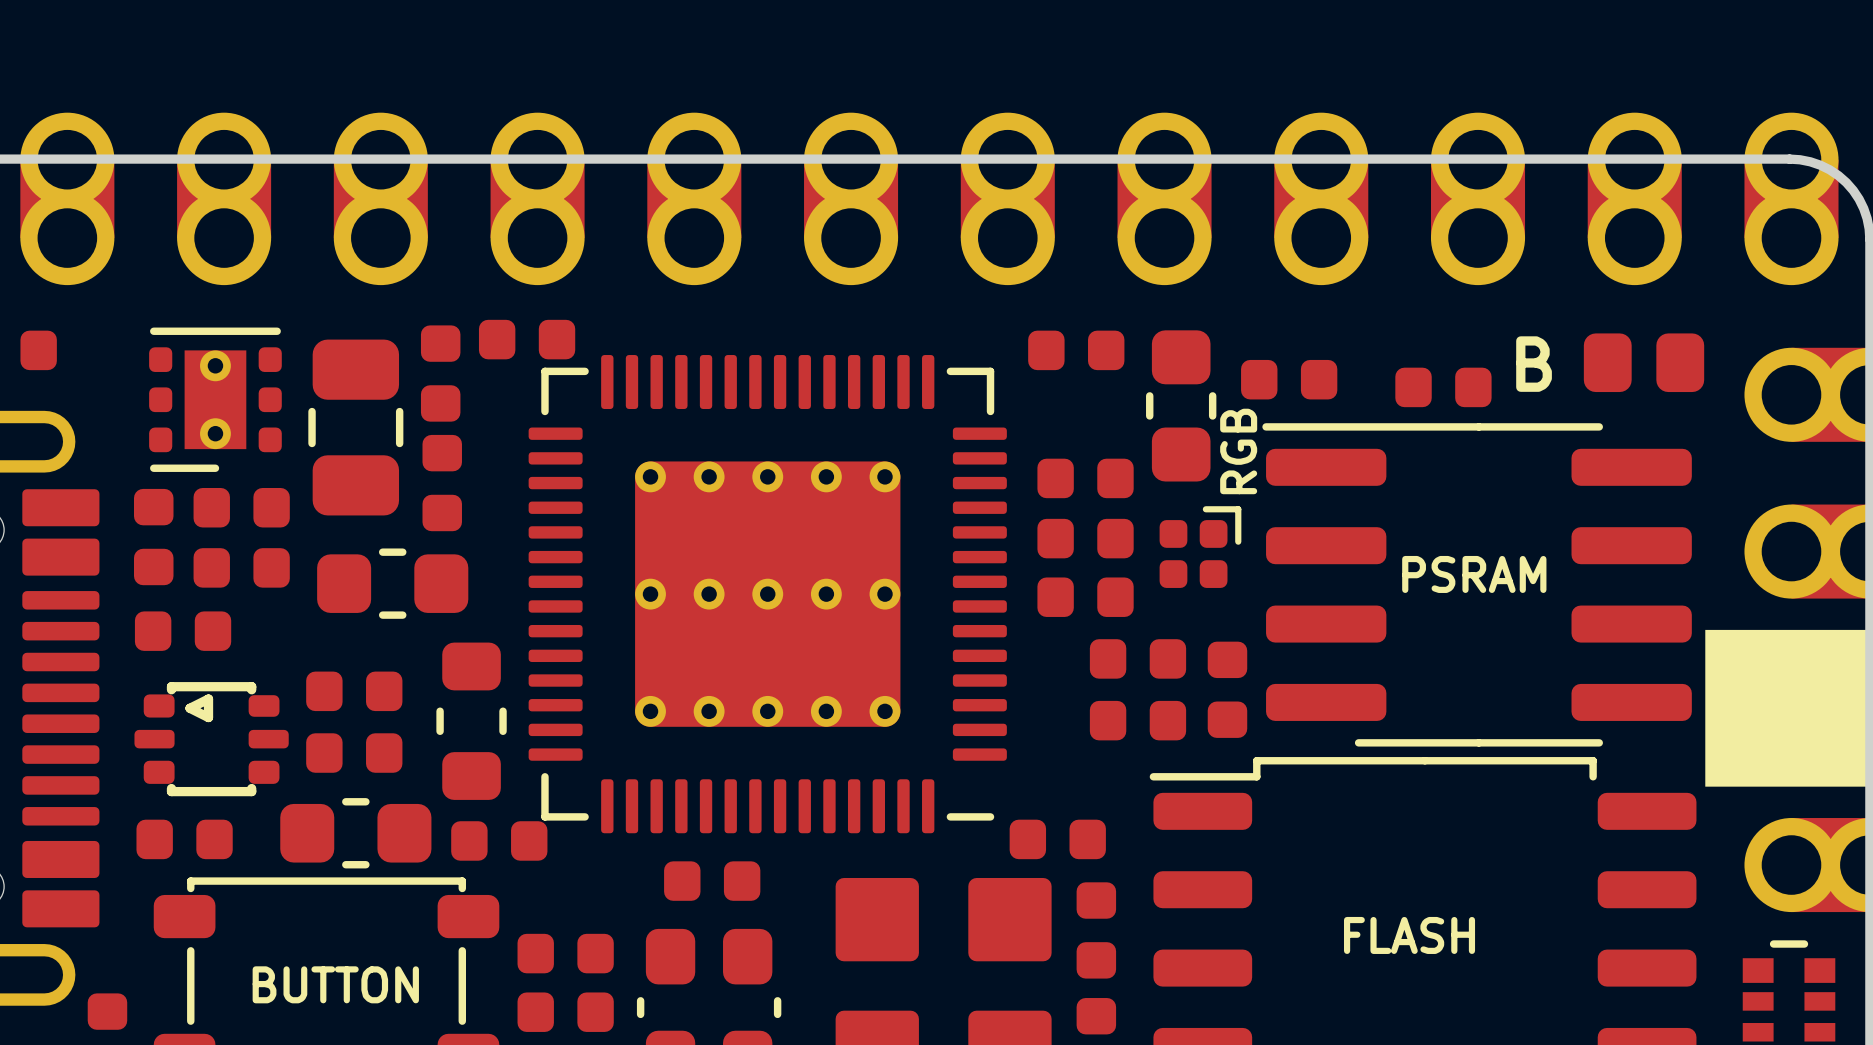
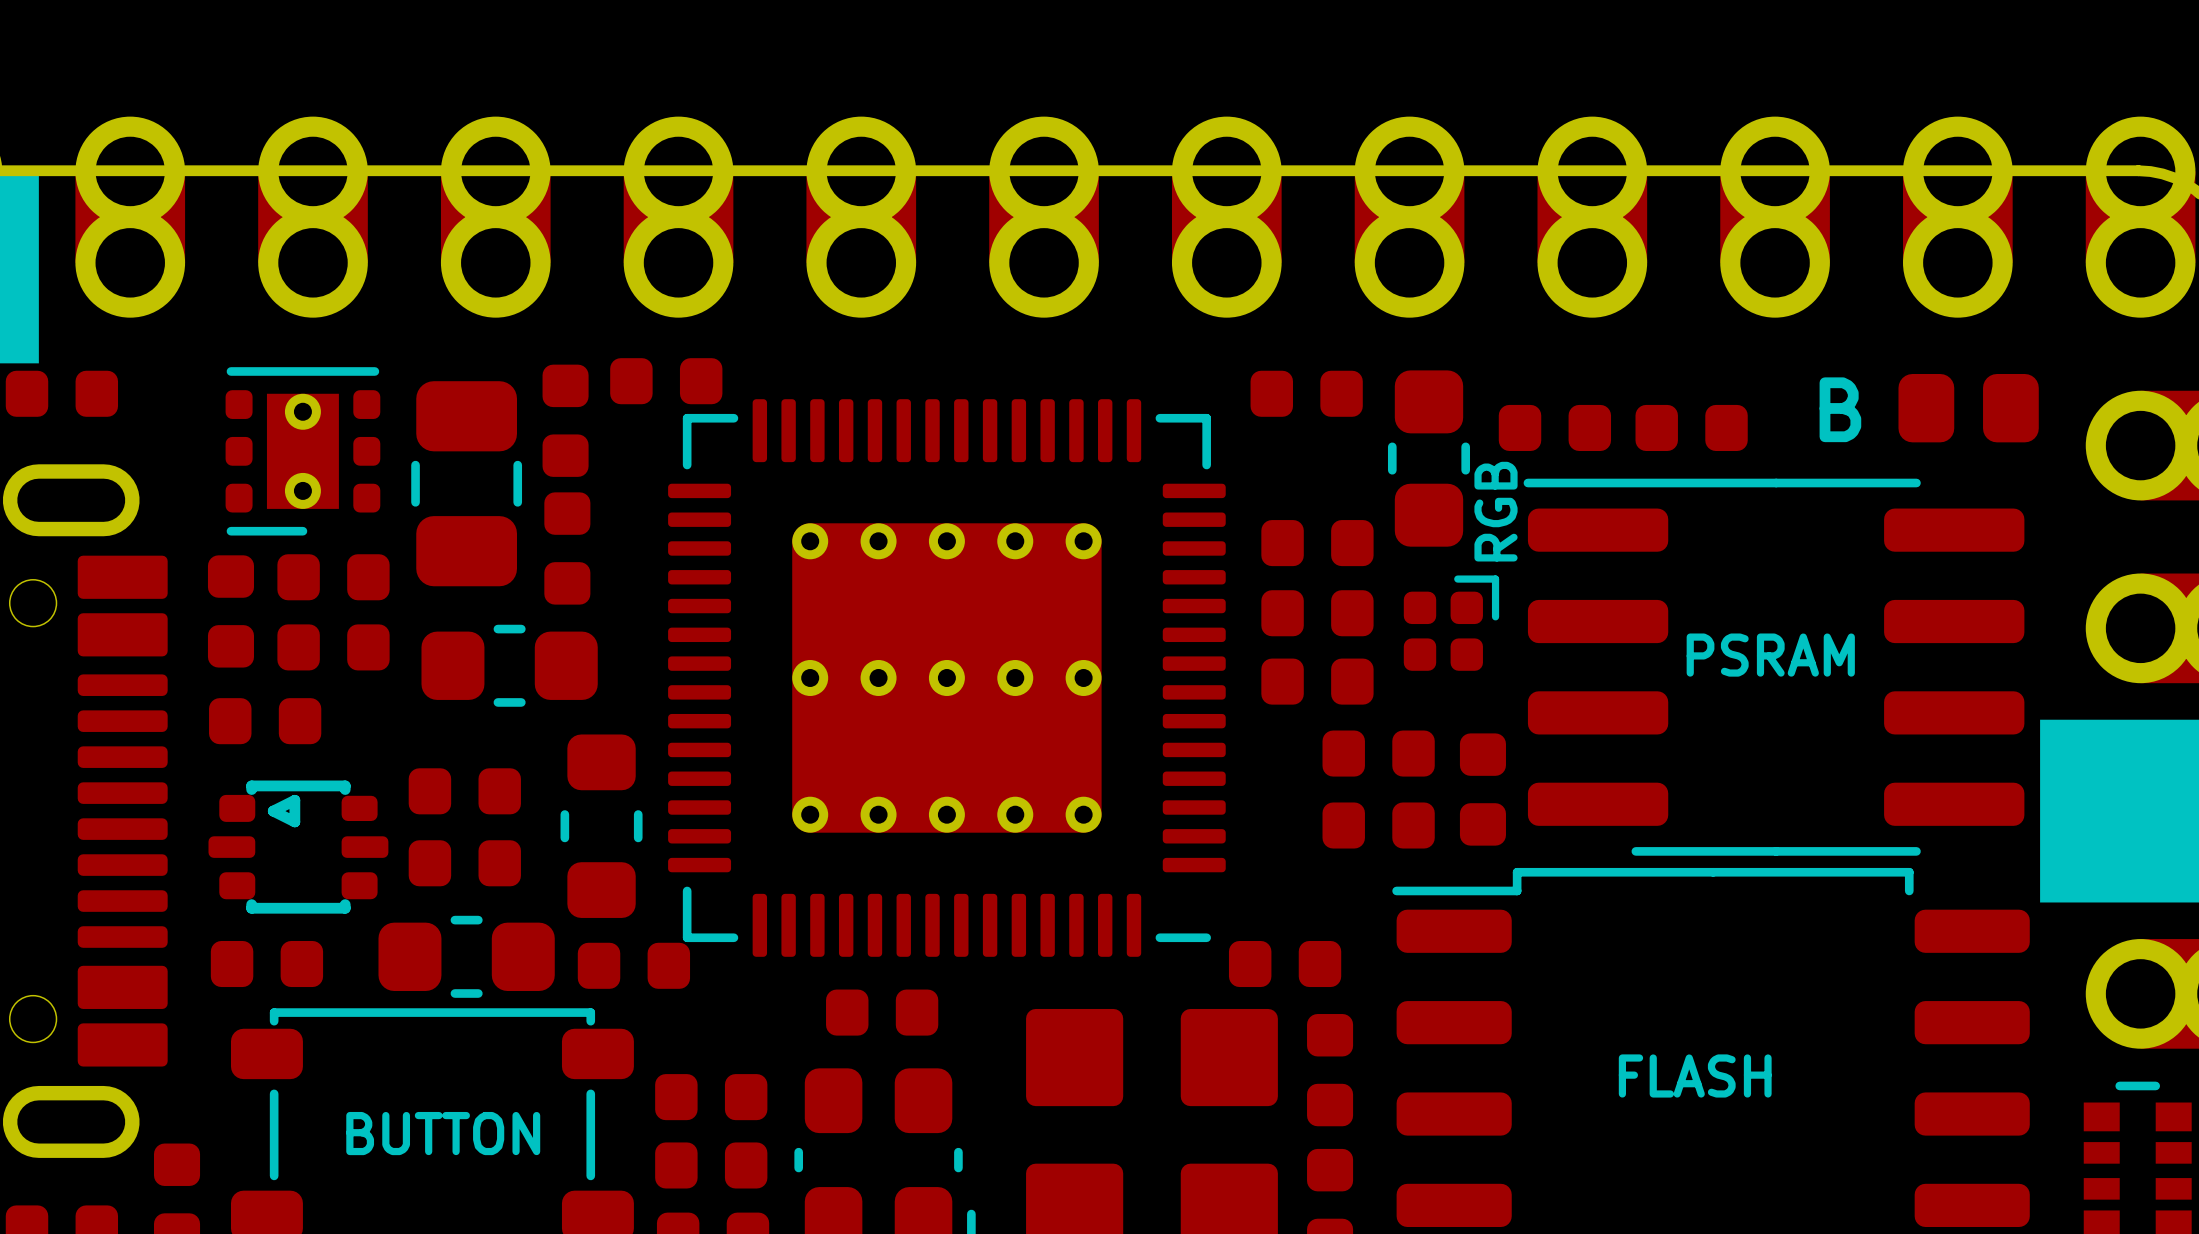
part position: (1443, 387) -> (1691, 427)

